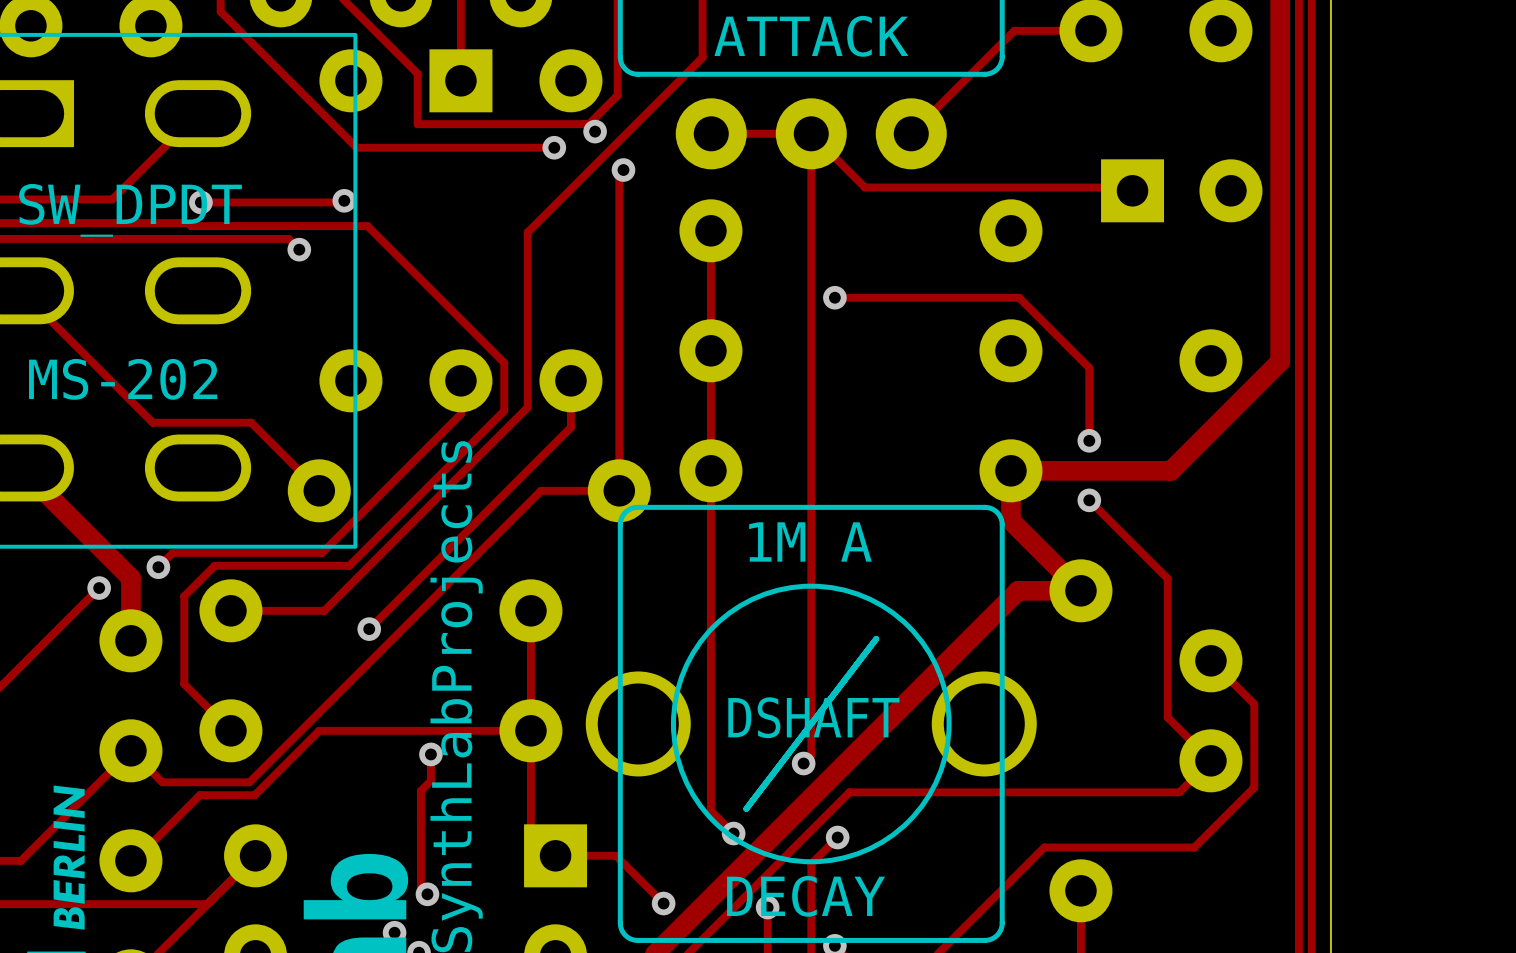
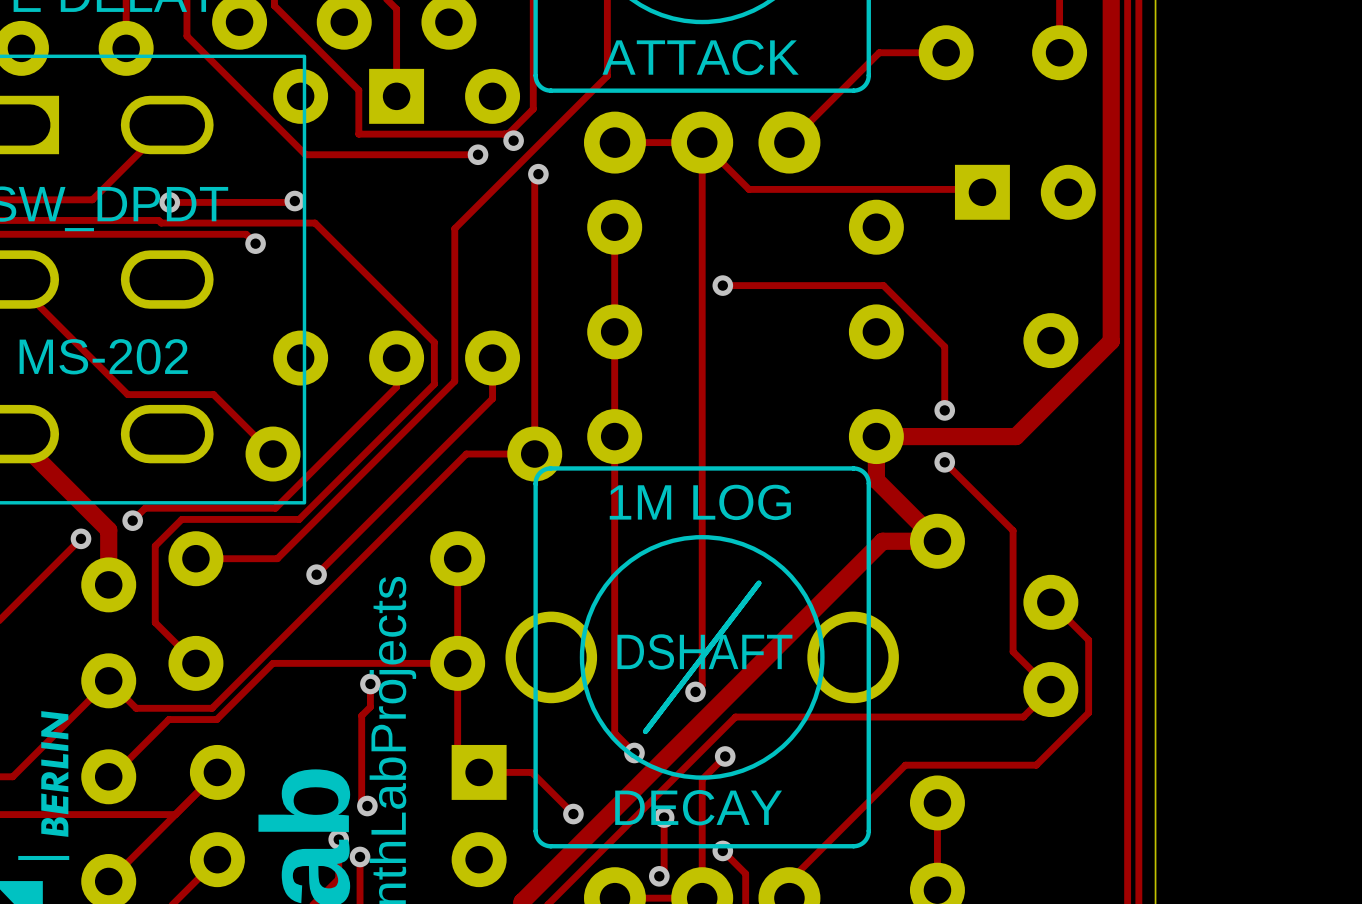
part value: 1M A (810, 541) -> 1M LOG (700, 502)

